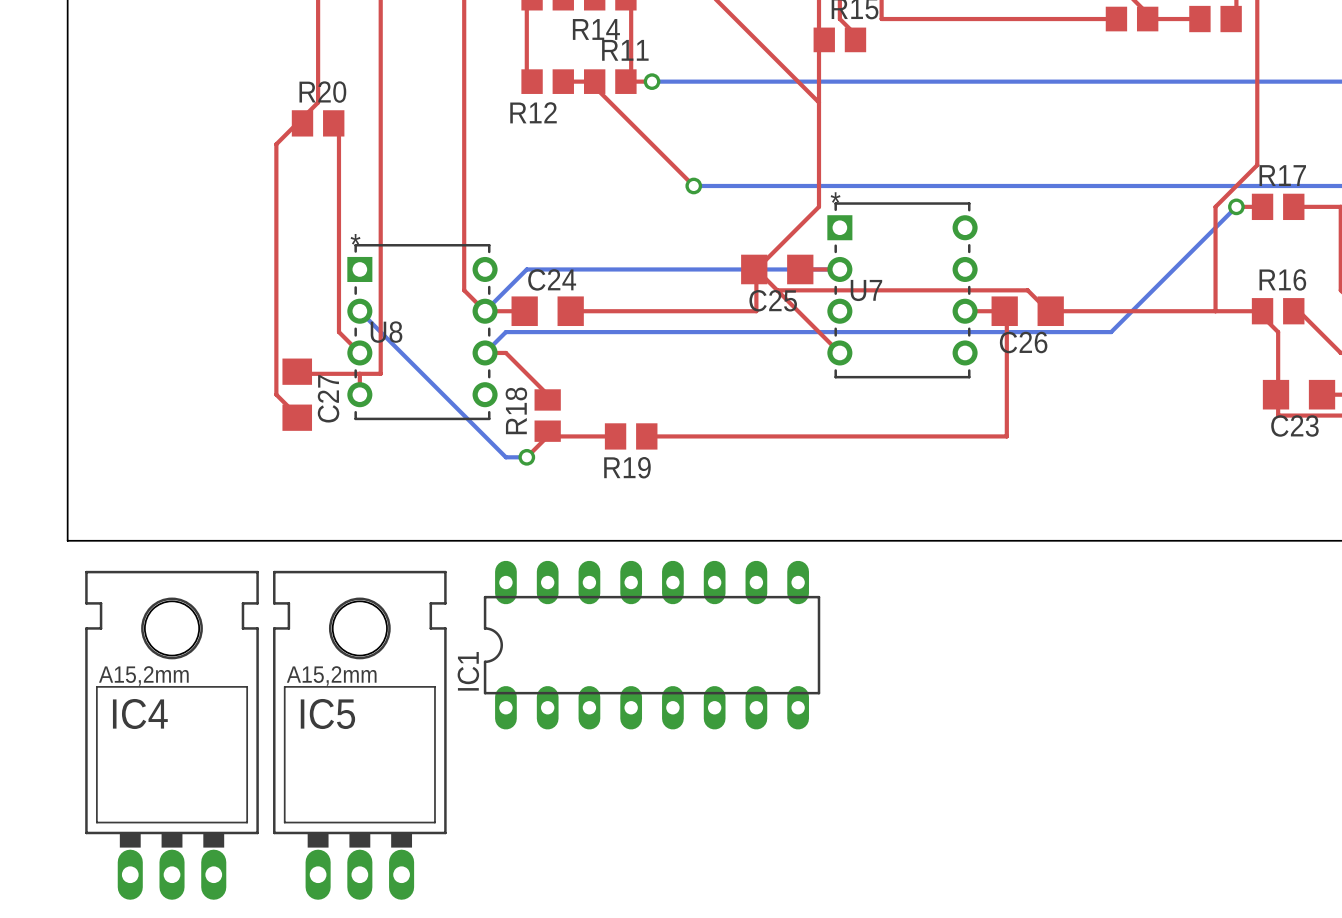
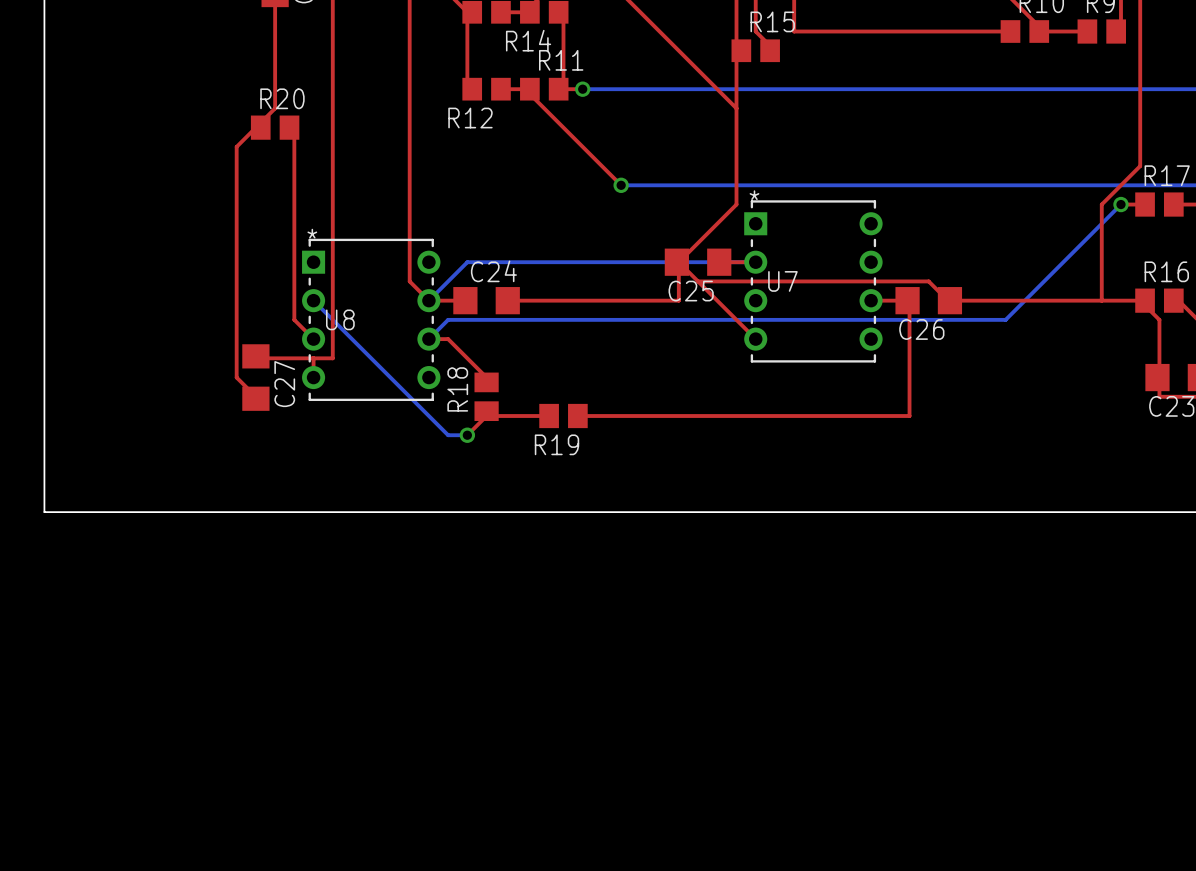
IC1: (652, 645) -> none
IC4: (172, 735) -> none
IC5: (359, 735) -> none

